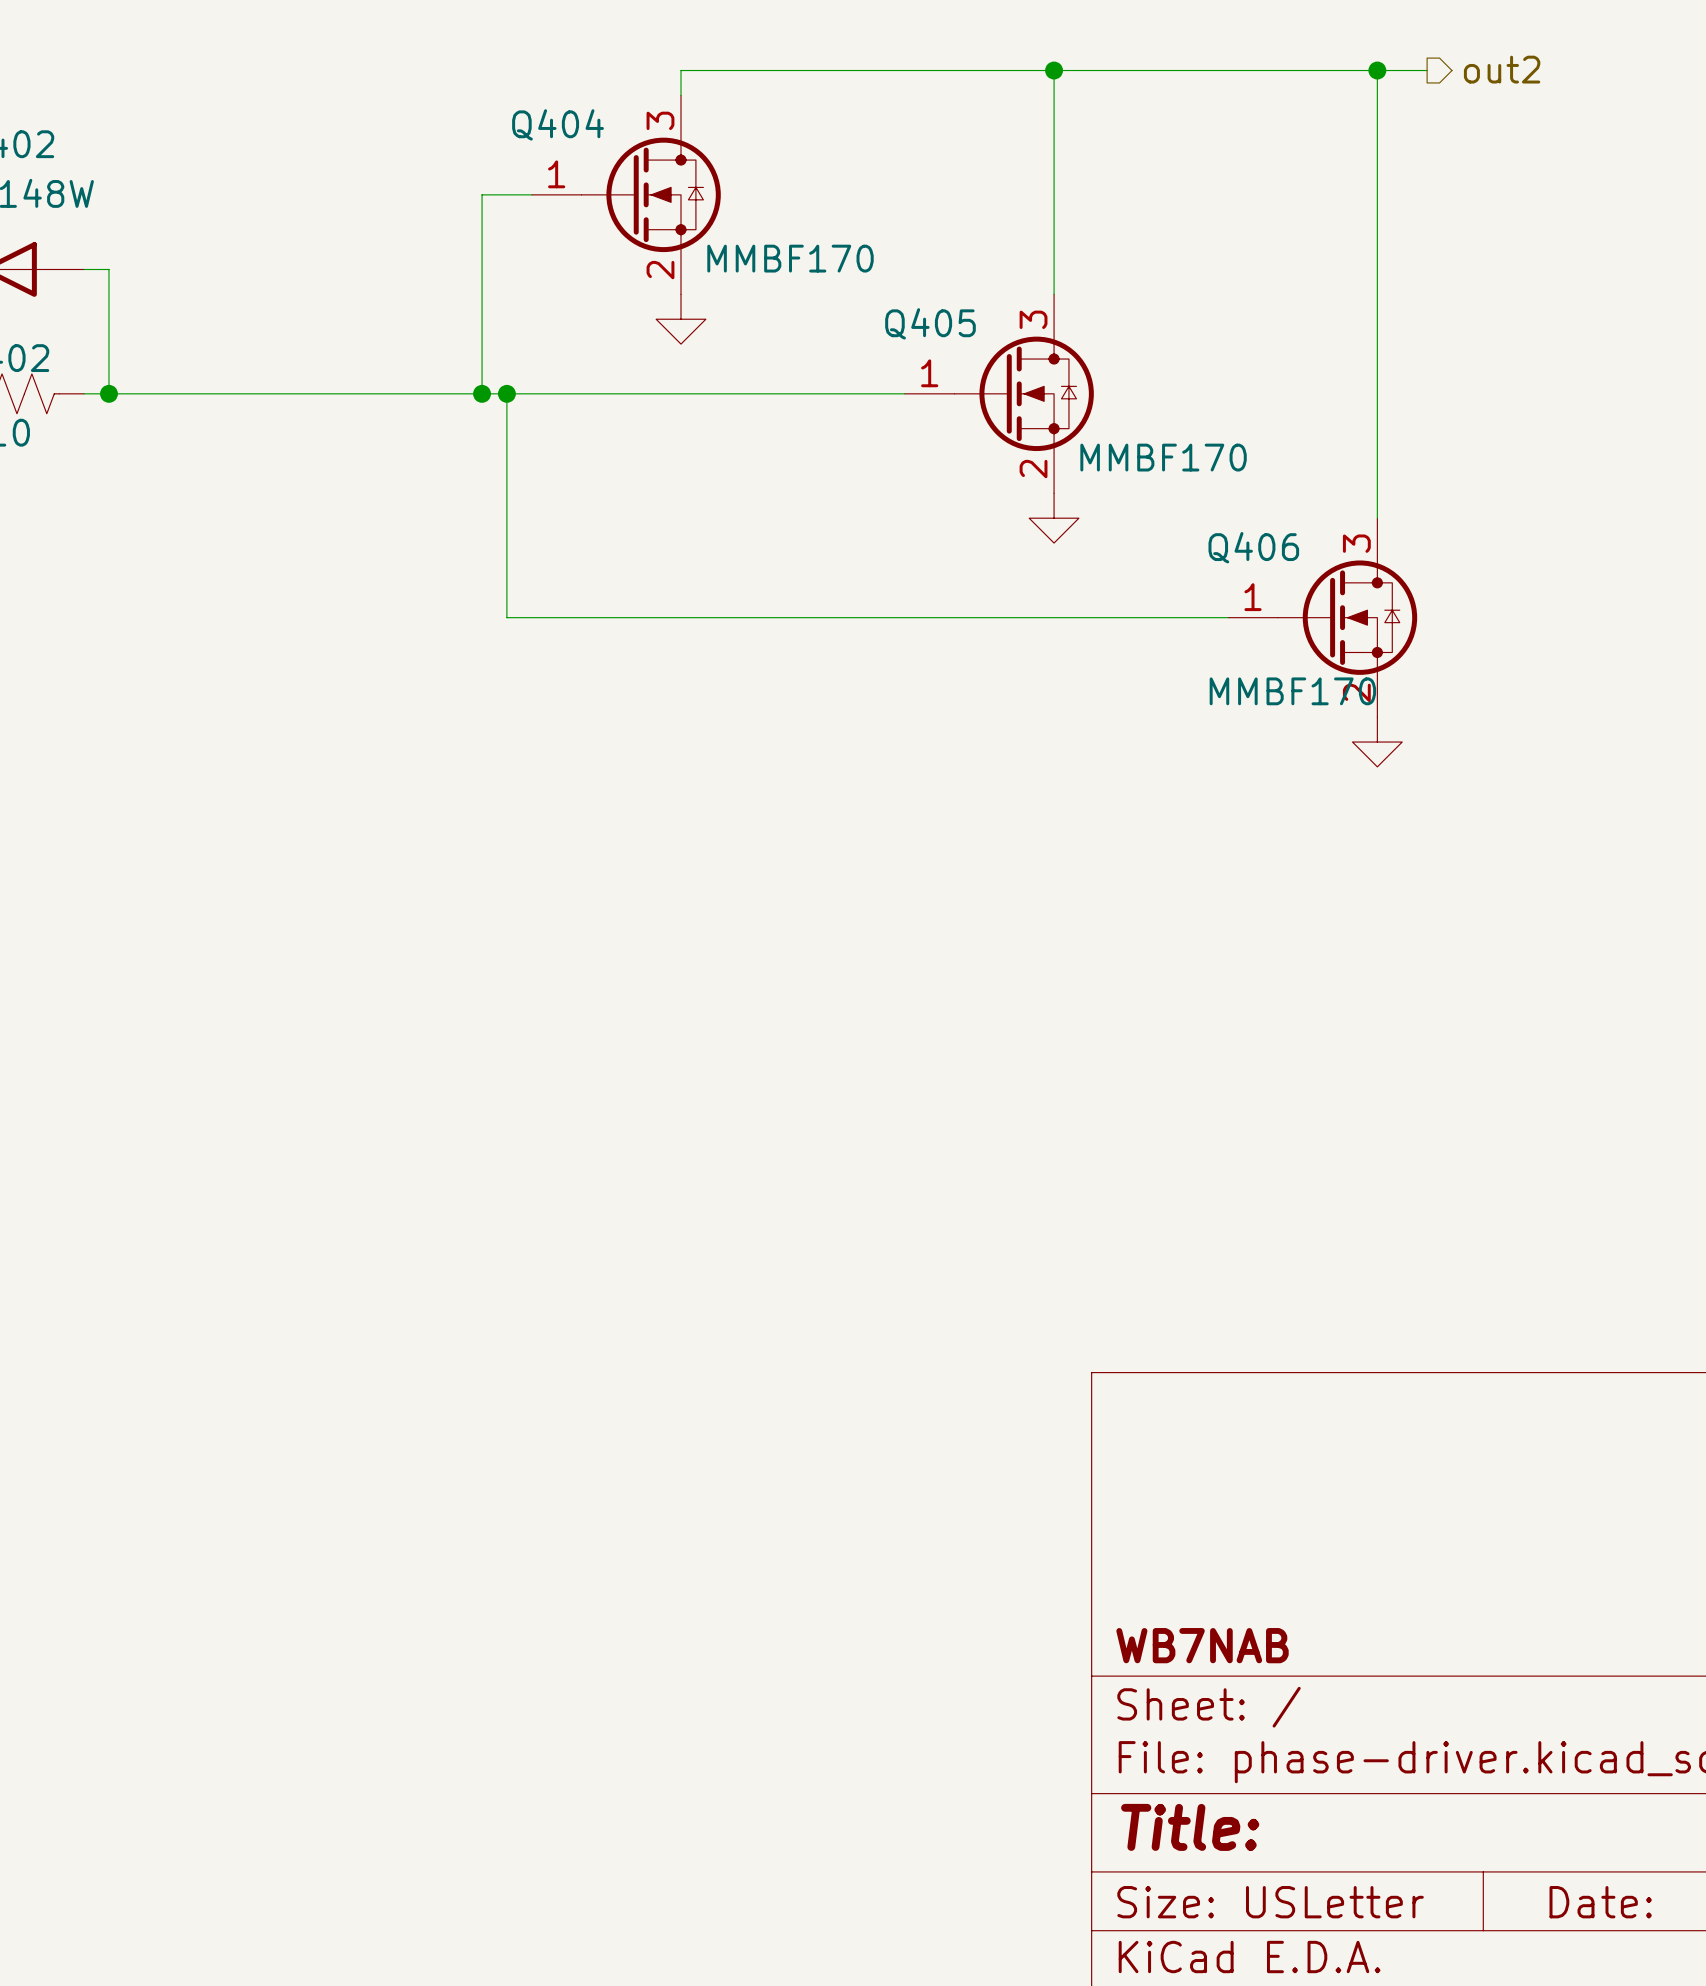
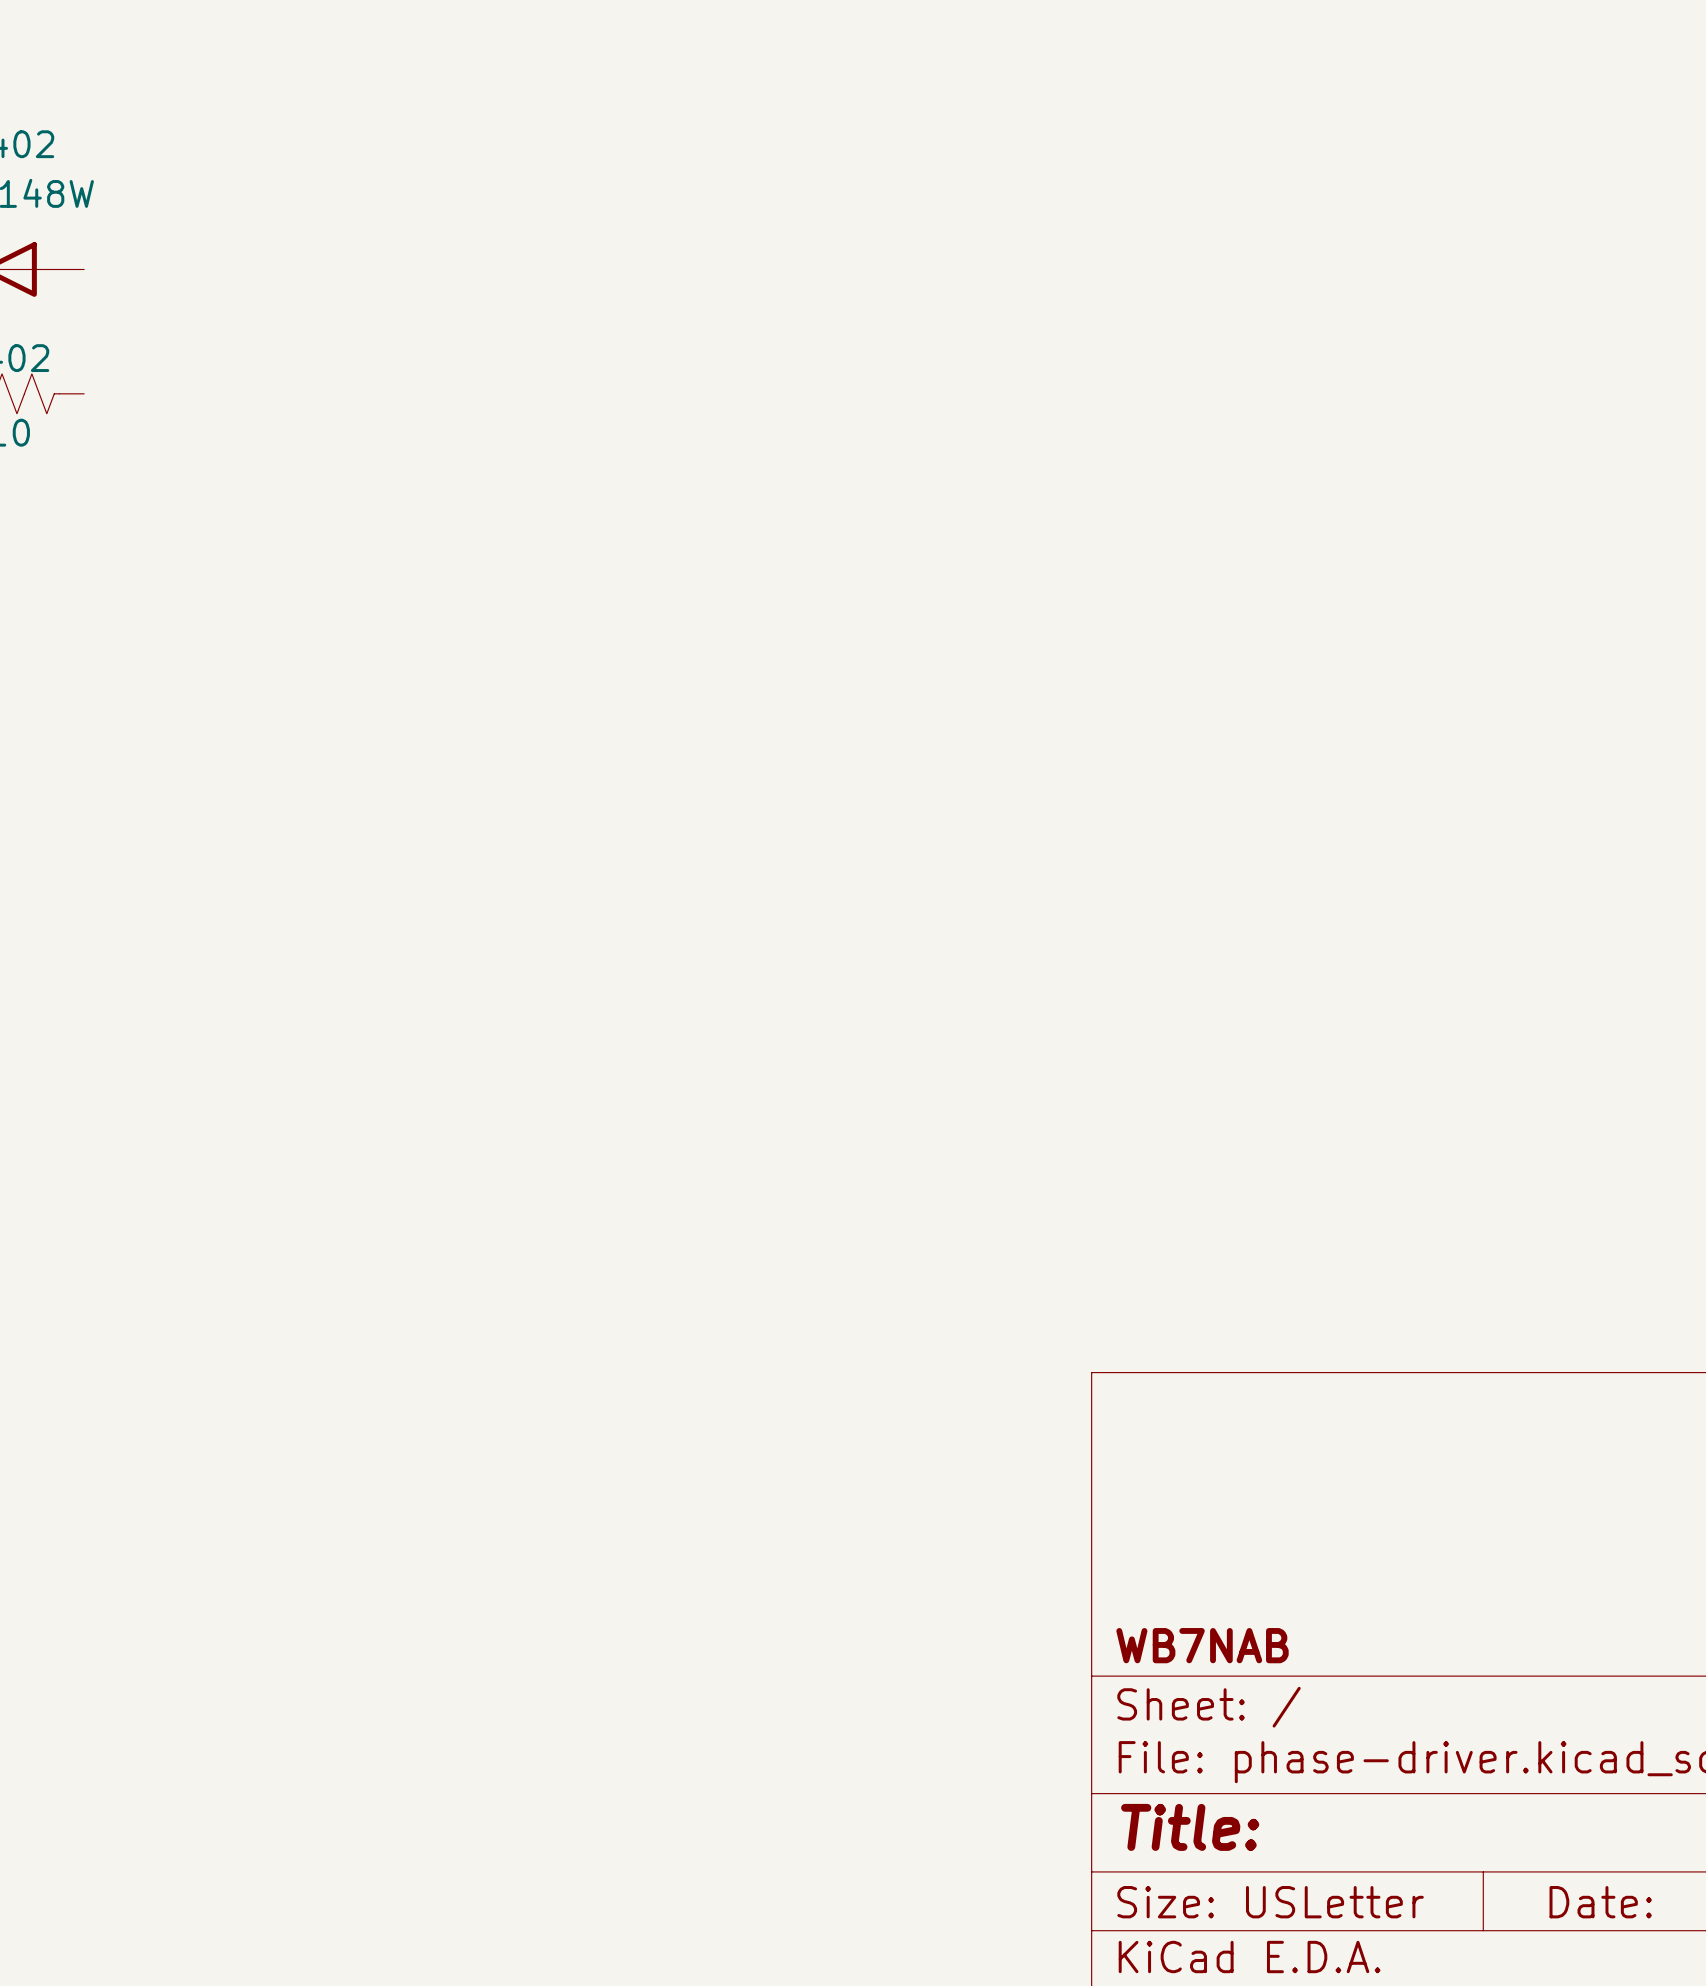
hierarchical label: out2 (1502, 69) -> none
wire: (1054, 70) (1054, 294) -> none
junction: (1054, 70) -> none
wire: (1377, 70) (1377, 518) -> none
junction: (1377, 70) -> none
wire: (1427, 70) (681, 70) (681, 95) -> none
wire: (531, 194) (482, 194) (482, 393) -> none
Q404: MMBF170 (626, 194) -> none
wire: (84, 269) (108, 269) (108, 393) -> none
power symbol: (681, 319) -> none
wire: (84, 393) (904, 393) -> none
junction: (108, 393) -> none
junction: (482, 393) -> none
wire: (506, 393) (506, 617) (1228, 617) -> none
junction: (506, 393) -> none
Q405: MMBF170 (999, 393) -> none
power symbol: (1054, 518) -> none
Q406: MMBF170 (1322, 617) -> none
power symbol: (1377, 742) -> none

